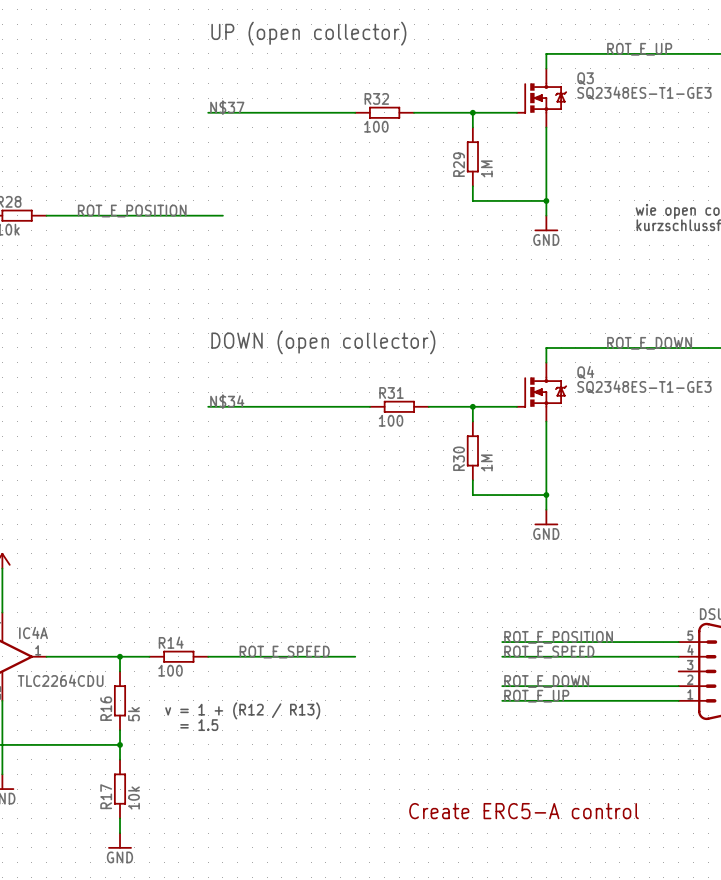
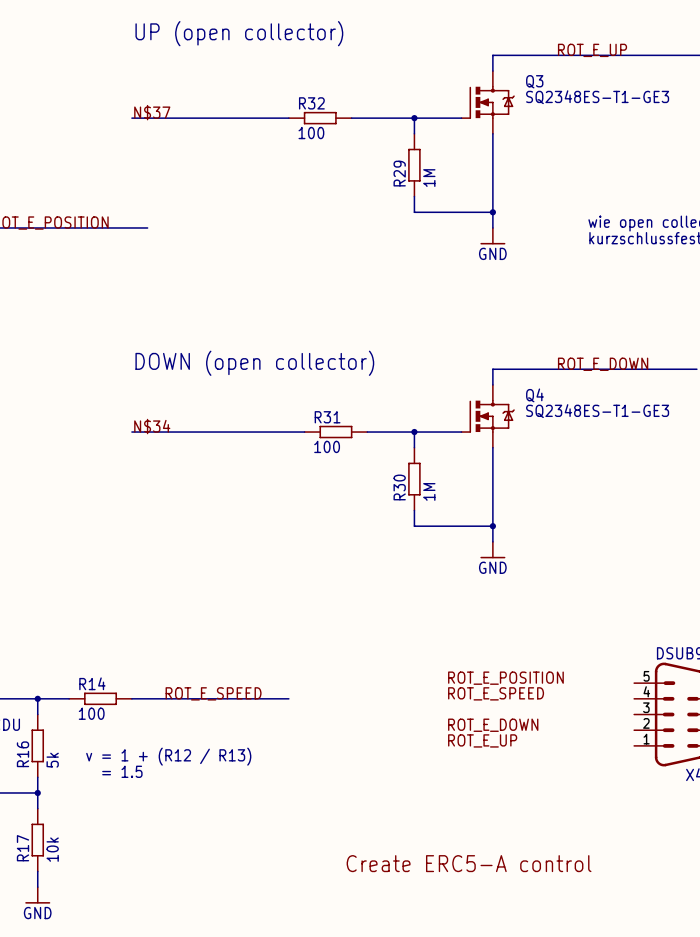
wire: (502, 642) (678, 642) -> none
wire: (502, 656) (678, 656) -> none
wire: (502, 686) (678, 686) -> none
wire: (502, 700) (678, 700) -> none

